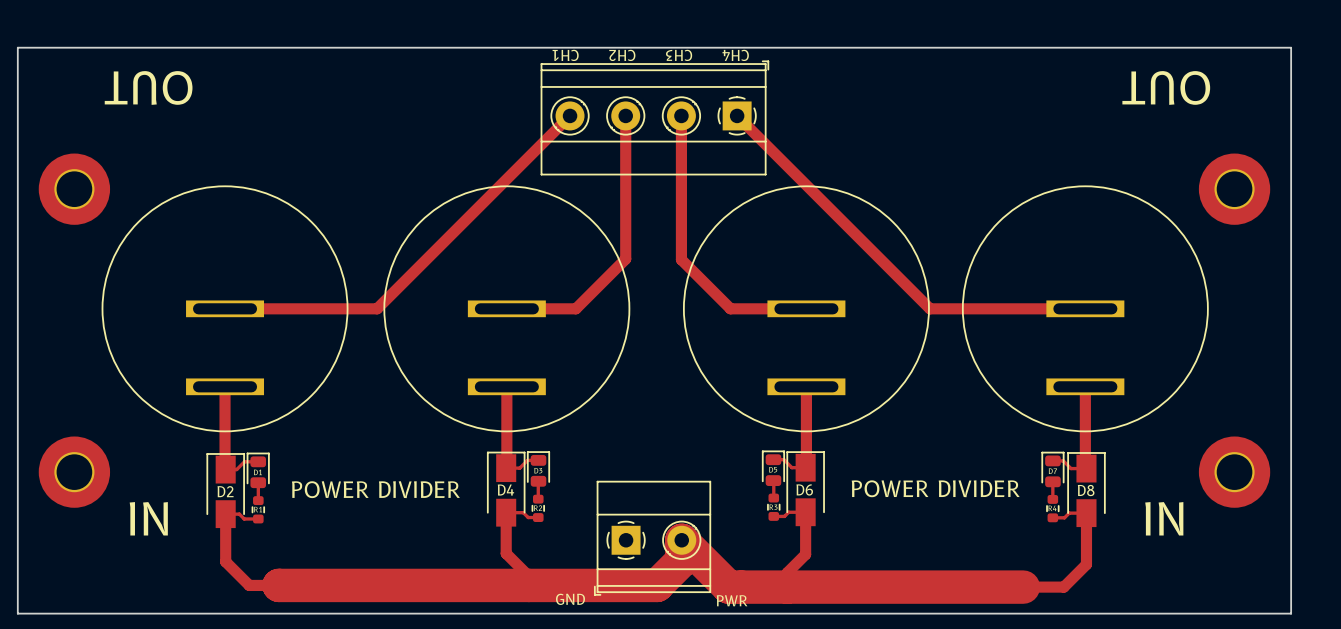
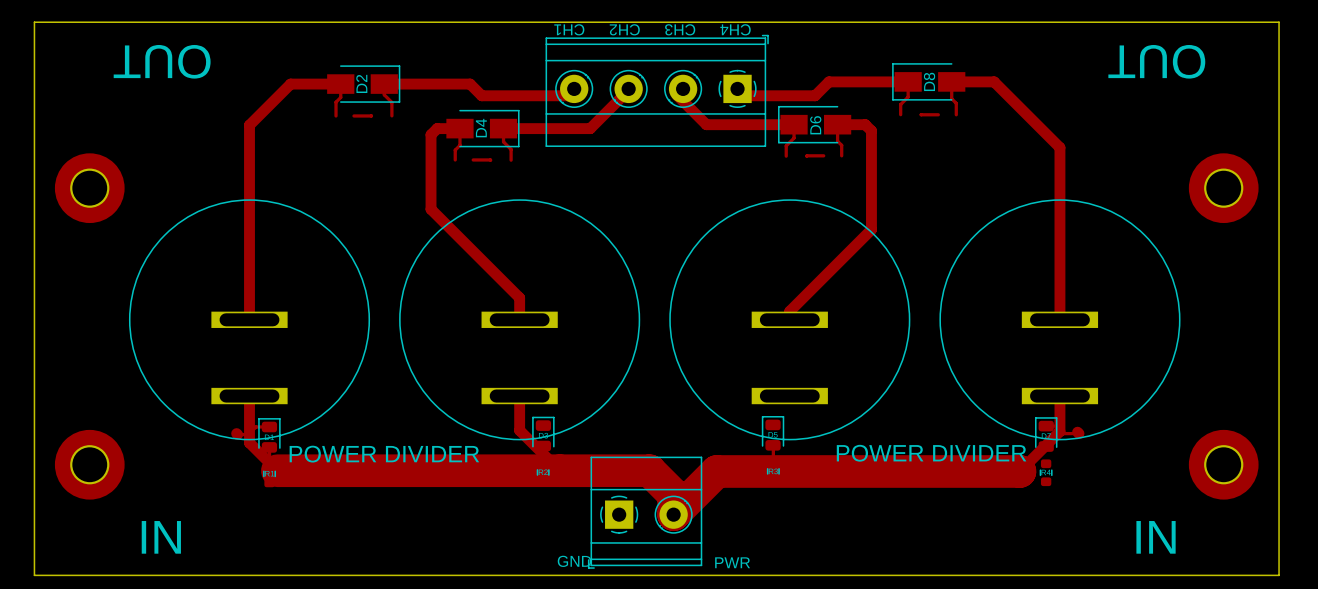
track: (570, 115) (377, 308) (225, 308) -> none
track: (625, 115) (625, 259) (575, 308) (506, 308) -> none
track: (681, 115) (681, 259) (730, 308) (806, 308) -> none
track: (737, 115) (930, 308) (1085, 308) -> none
track: none -> (568, 95) (481, 95) (470, 84) (384, 84) (384, 94) (391, 102) (391, 115)
track: none -> (623, 95) (590, 128) (503, 128) (503, 141) (511, 149) (511, 160)
track: none -> (677, 95) (706, 124) (794, 124) (794, 138) (786, 145) (786, 156)
track: none -> (731, 95) (815, 95) (829, 81) (908, 81) (908, 97) (900, 104) (900, 114)
track: none -> (921, 114) (938, 114)
track: none -> (956, 114) (956, 103) (951, 98) (951, 81) (994, 81) (1059, 147) (1059, 319)
track: none -> (336, 115) (336, 102) (340, 97) (340, 84) (290, 84) (249, 125) (249, 319)
track: none -> (353, 115) (371, 115)
track: none -> (823, 155) (806, 156)
track: none -> (841, 155) (841, 145) (837, 141) (837, 124) (865, 124) (871, 130) (871, 229) (789, 311) (789, 319)
track: none -> (455, 159) (455, 150) (459, 145) (459, 128) (437, 128) (431, 134) (431, 209) (519, 297) (519, 319)
track: none -> (473, 159) (490, 160)
part position: (74, 189) -> (89, 188)
part position: (1234, 189) -> (1223, 188)
part: (225, 308) -> none
part: (506, 308) -> none
part: (806, 308) -> none
part: (1085, 308) -> none
part: none -> (249, 319)
part: none -> (519, 319)
part: none -> (789, 319)
part: none -> (1059, 319)
track: (225, 386) (225, 468) -> none
track: (506, 386) (506, 468) (519, 468) (527, 460) (538, 460) -> none
track: (806, 386) (806, 466) (791, 467) (783, 459) (773, 459) -> none
track: (1085, 386) (1085, 467) -> none
track: none -> (249, 396) (249, 442) (277, 470) (649, 470) (673, 494) (673, 514) (716, 471) (1019, 471)
track: none -> (519, 396) (519, 430) (559, 470)
track: none -> (1059, 396) (1059, 431) (1019, 471)
part position: (74, 472) -> (89, 464)
part position: (1234, 472) -> (1223, 464)
track: (538, 481) (538, 499) -> none
track: (1052, 481) (1052, 499) -> none
D6 rotation: 0° (805, 488) -> 90° counterclockwise (814, 124)
D6 position: (805, 488) -> (814, 124)
D4 rotation: 0° (506, 489) -> 90° clockwise (482, 128)
D4 position: (506, 489) -> (482, 128)
D8 rotation: 0° (1086, 489) -> 90° counterclockwise (928, 81)
D8 position: (1086, 489) -> (928, 81)
D2 rotation: 0° (225, 490) -> 90° clockwise (363, 84)
D2 position: (225, 490) -> (363, 84)
track: (773, 516) (784, 516) (788, 512) (805, 512) (805, 554) (787, 572) (787, 587) -> none
track: (538, 517) (528, 517) (523, 512) (506, 512) (506, 553) (528, 576) (528, 585) -> none
track: (1052, 517) (1064, 517) (1069, 513) (1086, 513) (1086, 564) (1063, 587) (728, 587) (681, 540) (681, 560) (657, 585) (249, 585) (225, 561) (225, 514) (239, 514) (244, 518) (258, 518) -> none
text position: IN (148, 518) -> IN (161, 537)
text position: IN (1164, 518) -> IN (1156, 537)
part position: (652, 538) -> (645, 512)

